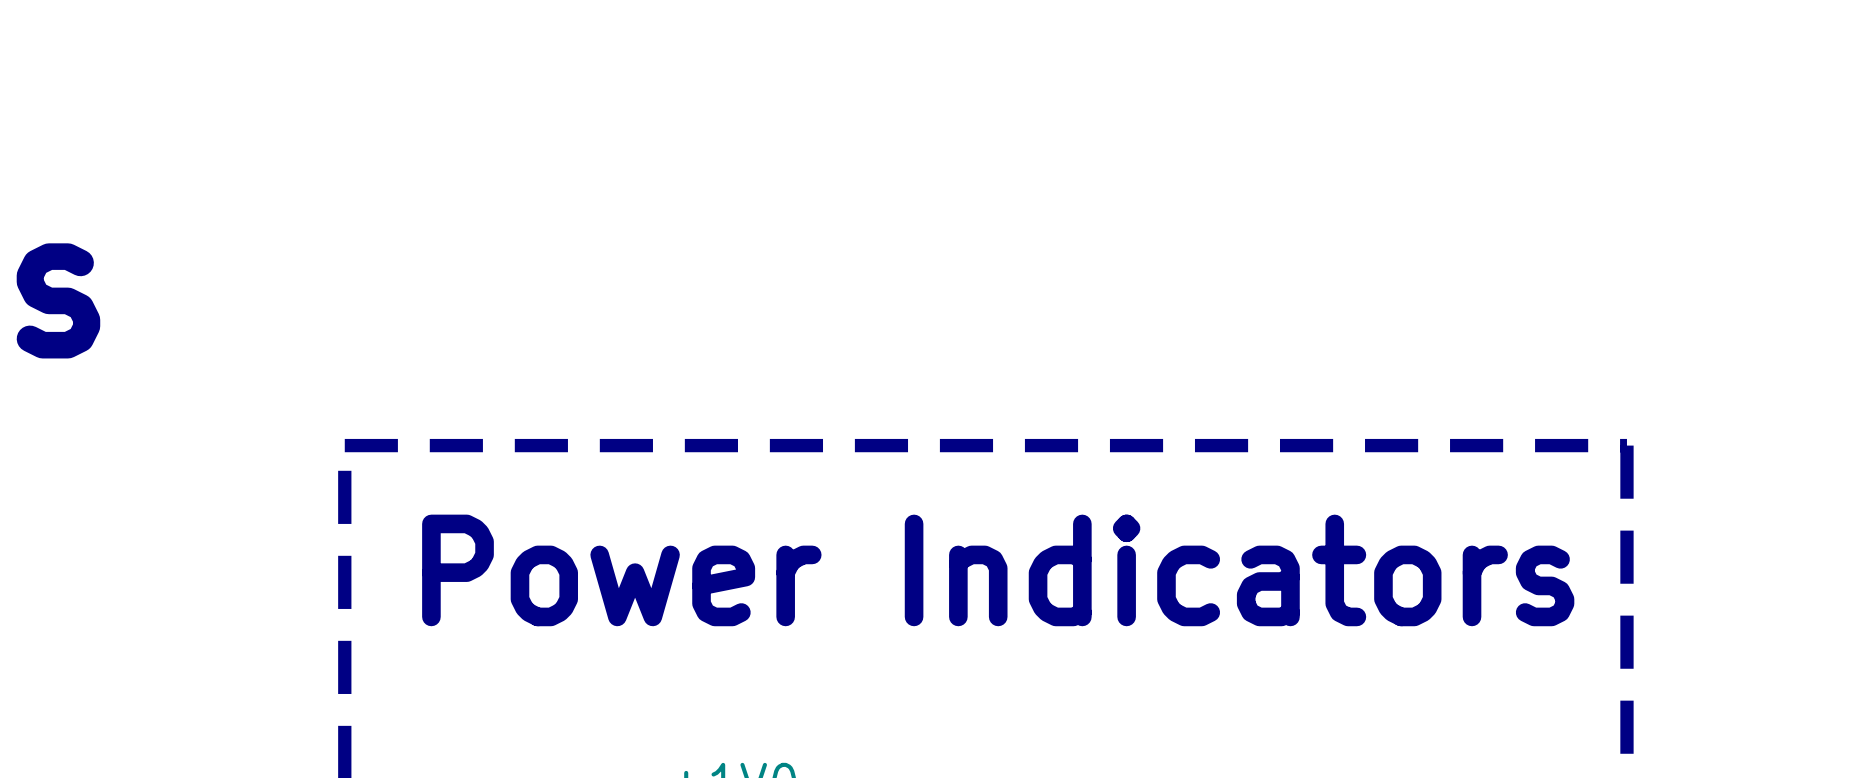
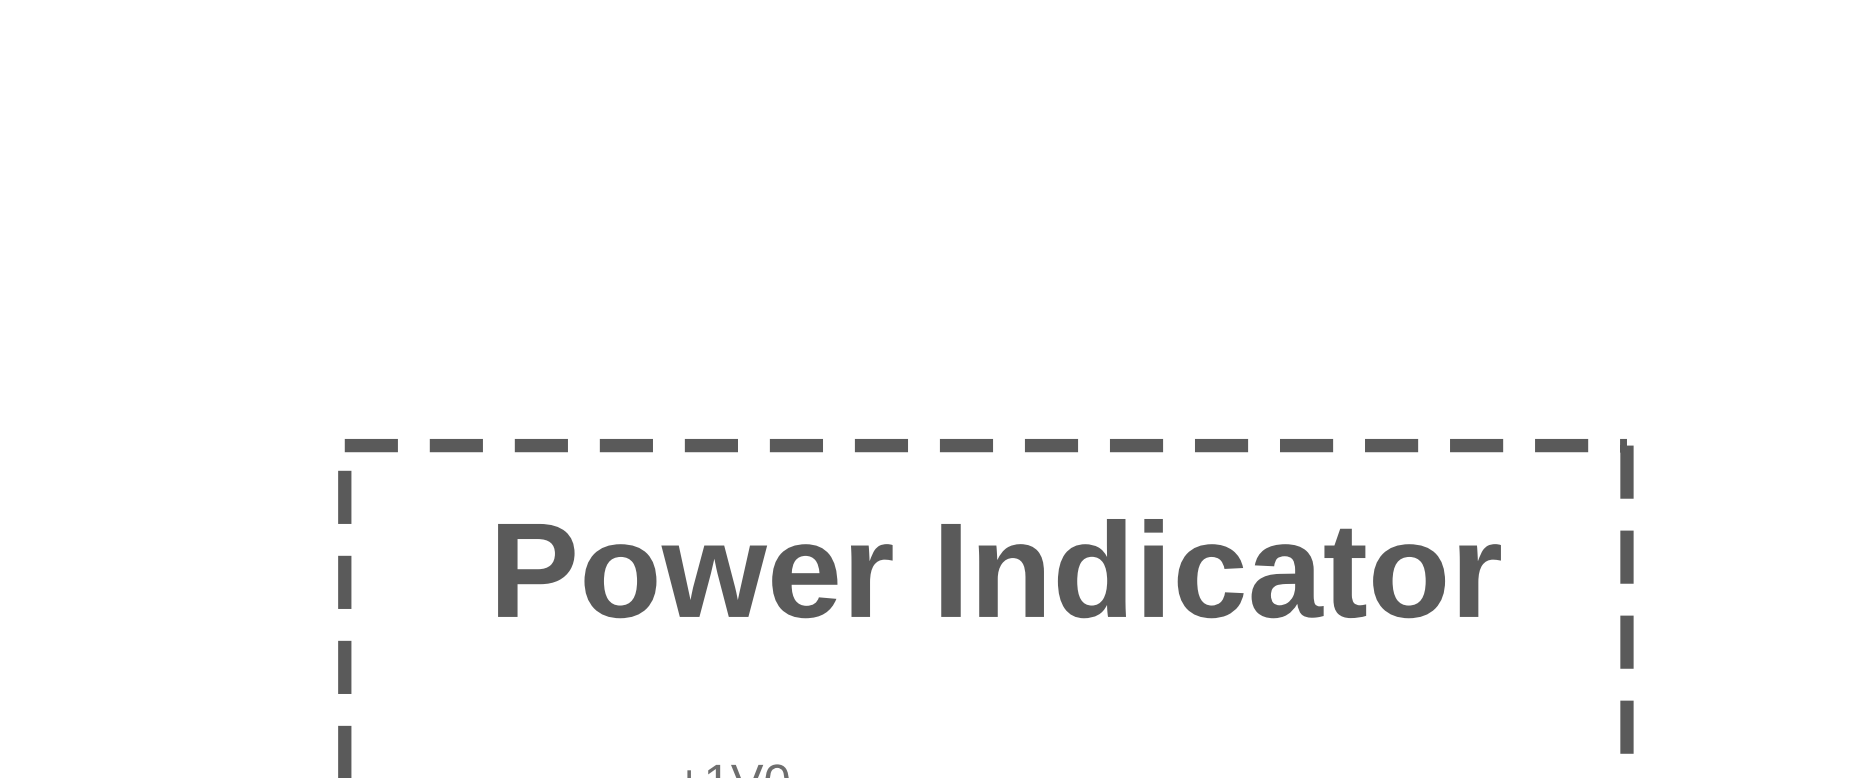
text: Power Indicators (998, 570) -> Power Indicator (999, 568)

